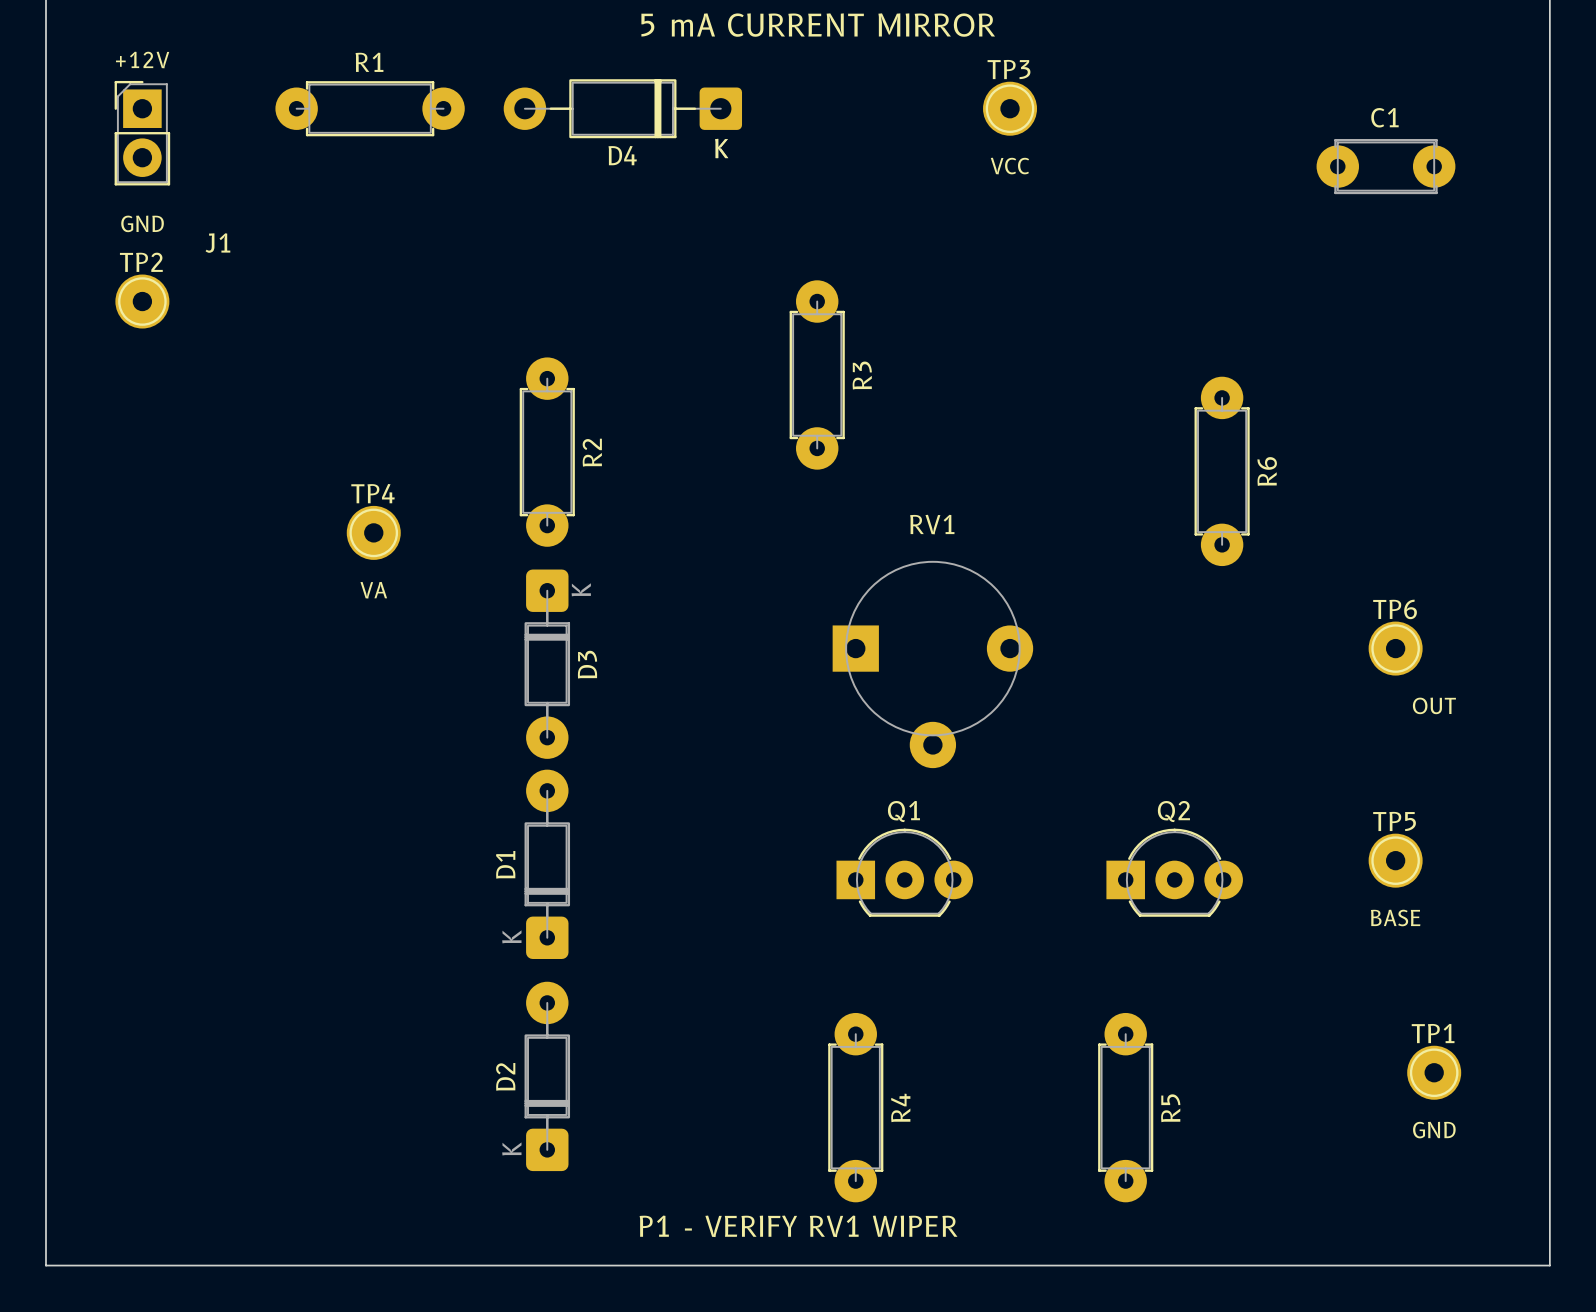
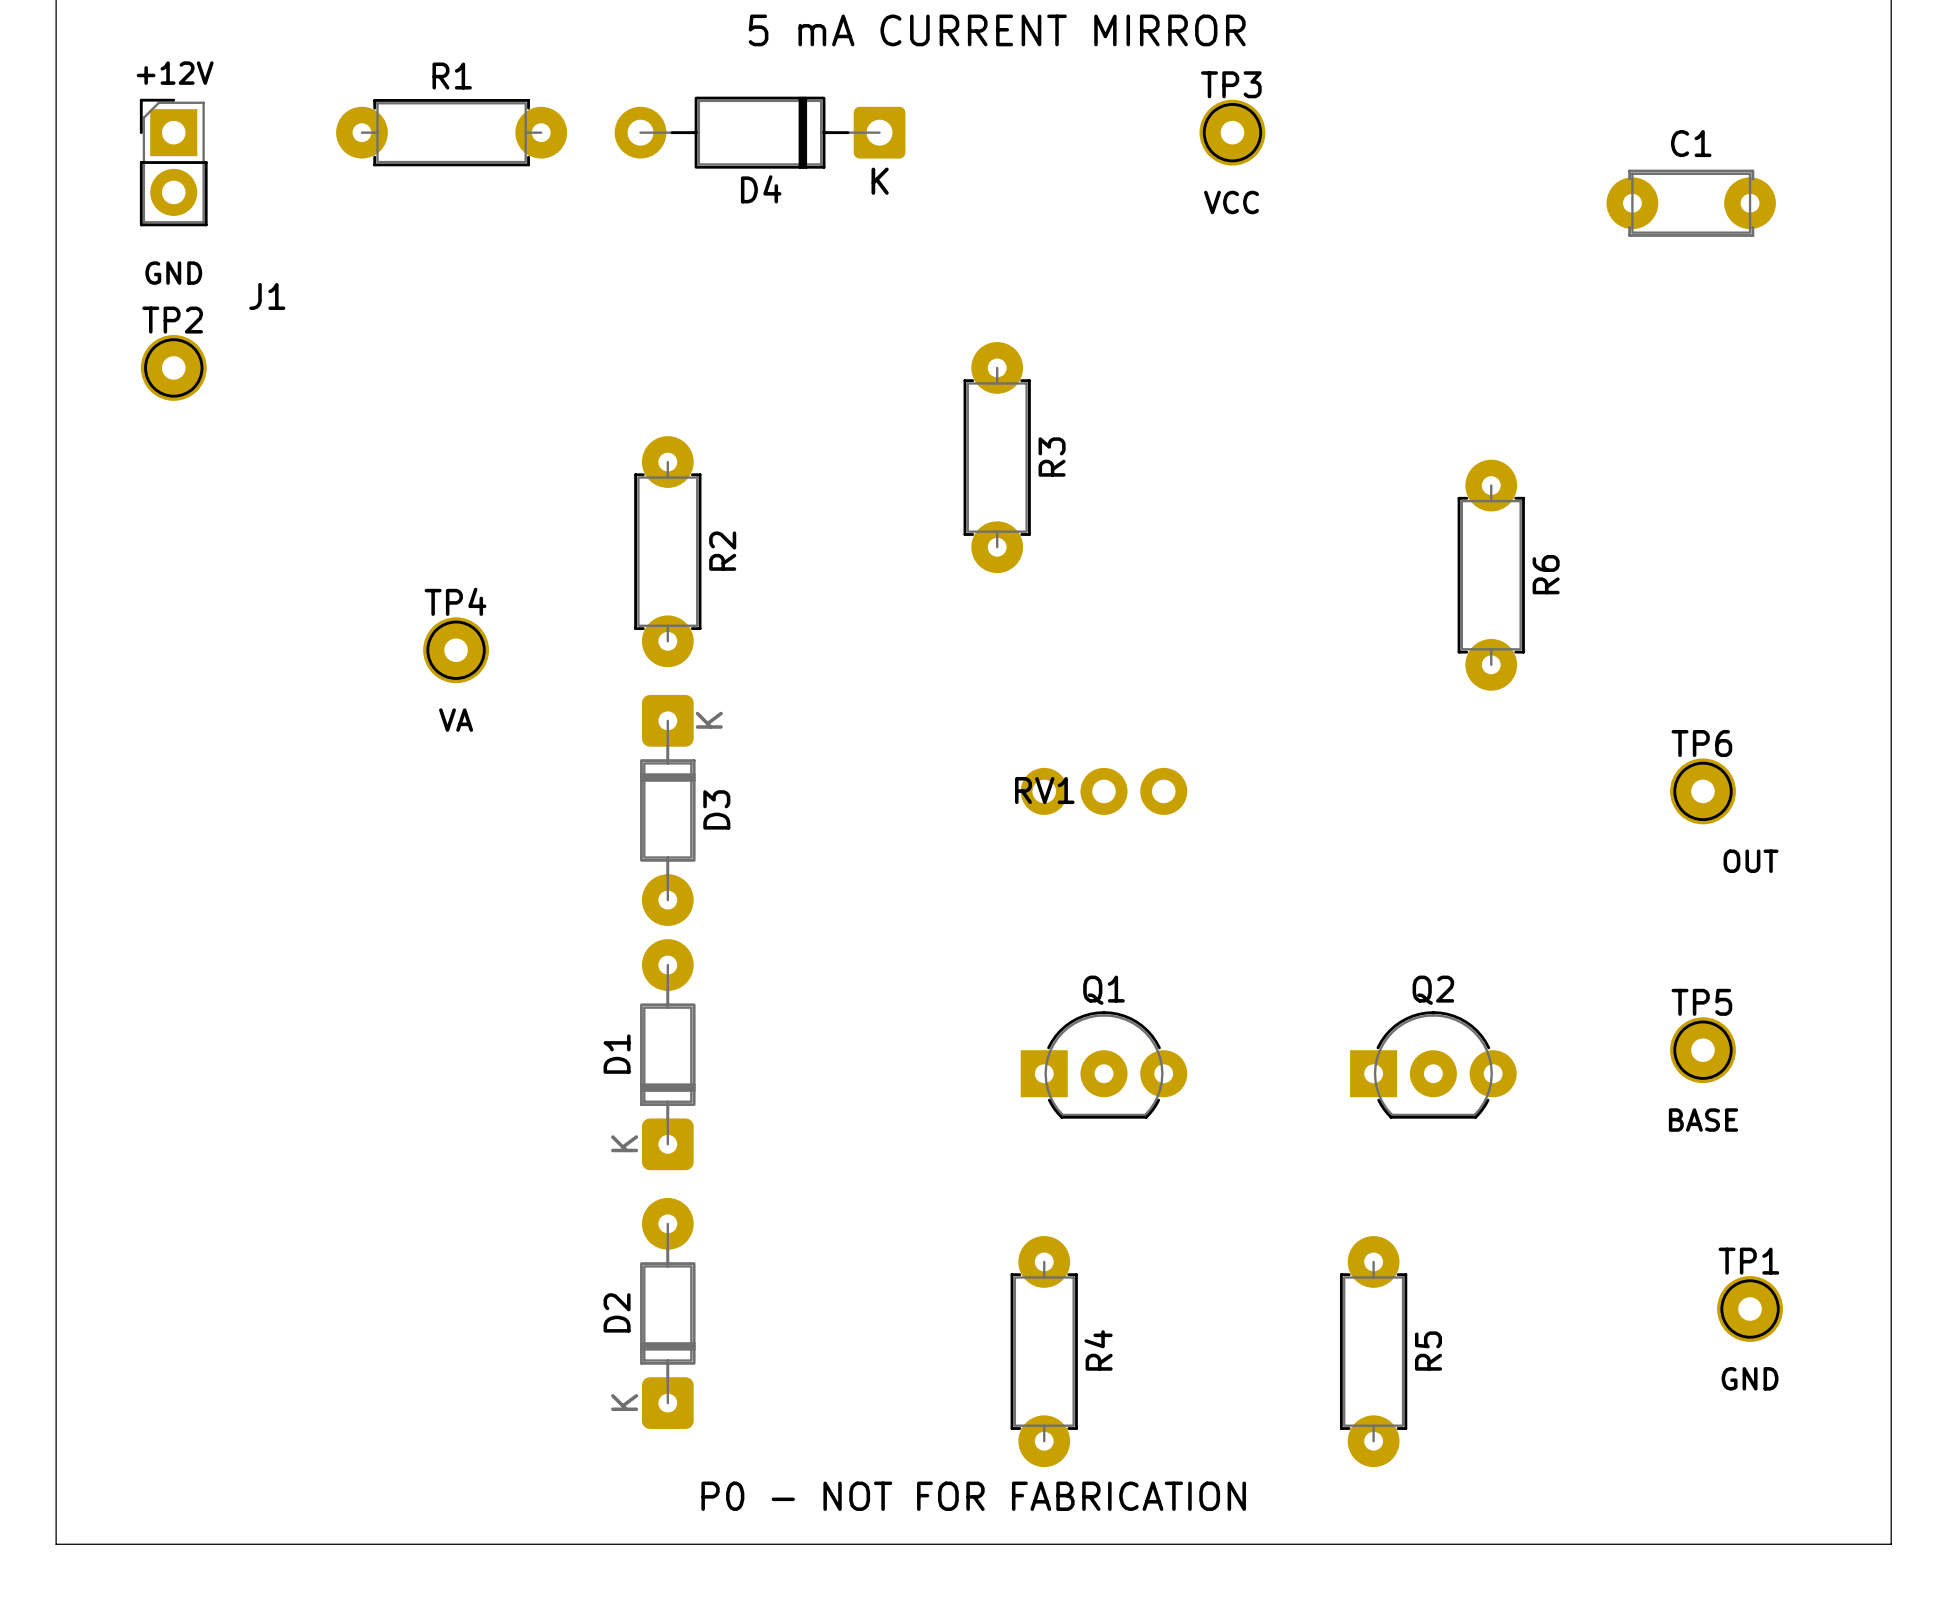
RV1 name position: RV1 (932, 524) -> RV1 (1044, 790)
RV1 footprint: [832, 560, 1034, 769] -> [1020, 767, 1188, 815]
text: P1 - VERIFY RV1 WIPER (798, 1226) -> P0 - NOT FOR FABRICATION (973, 1496)

